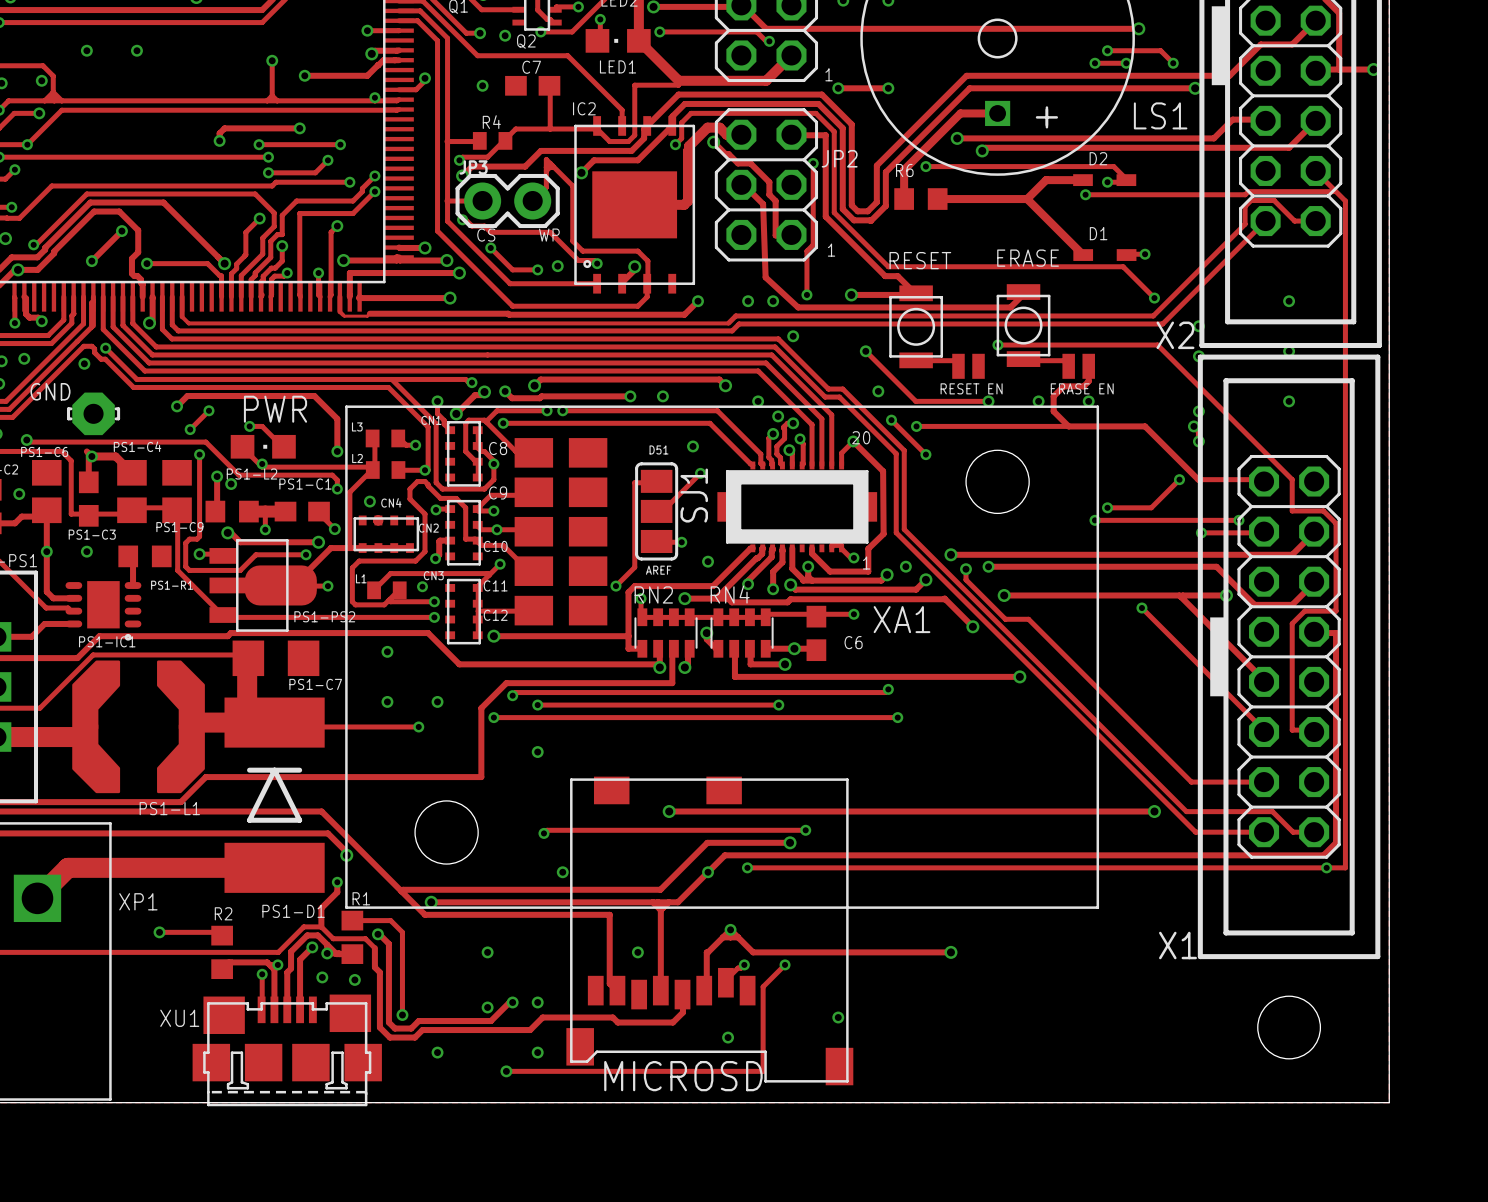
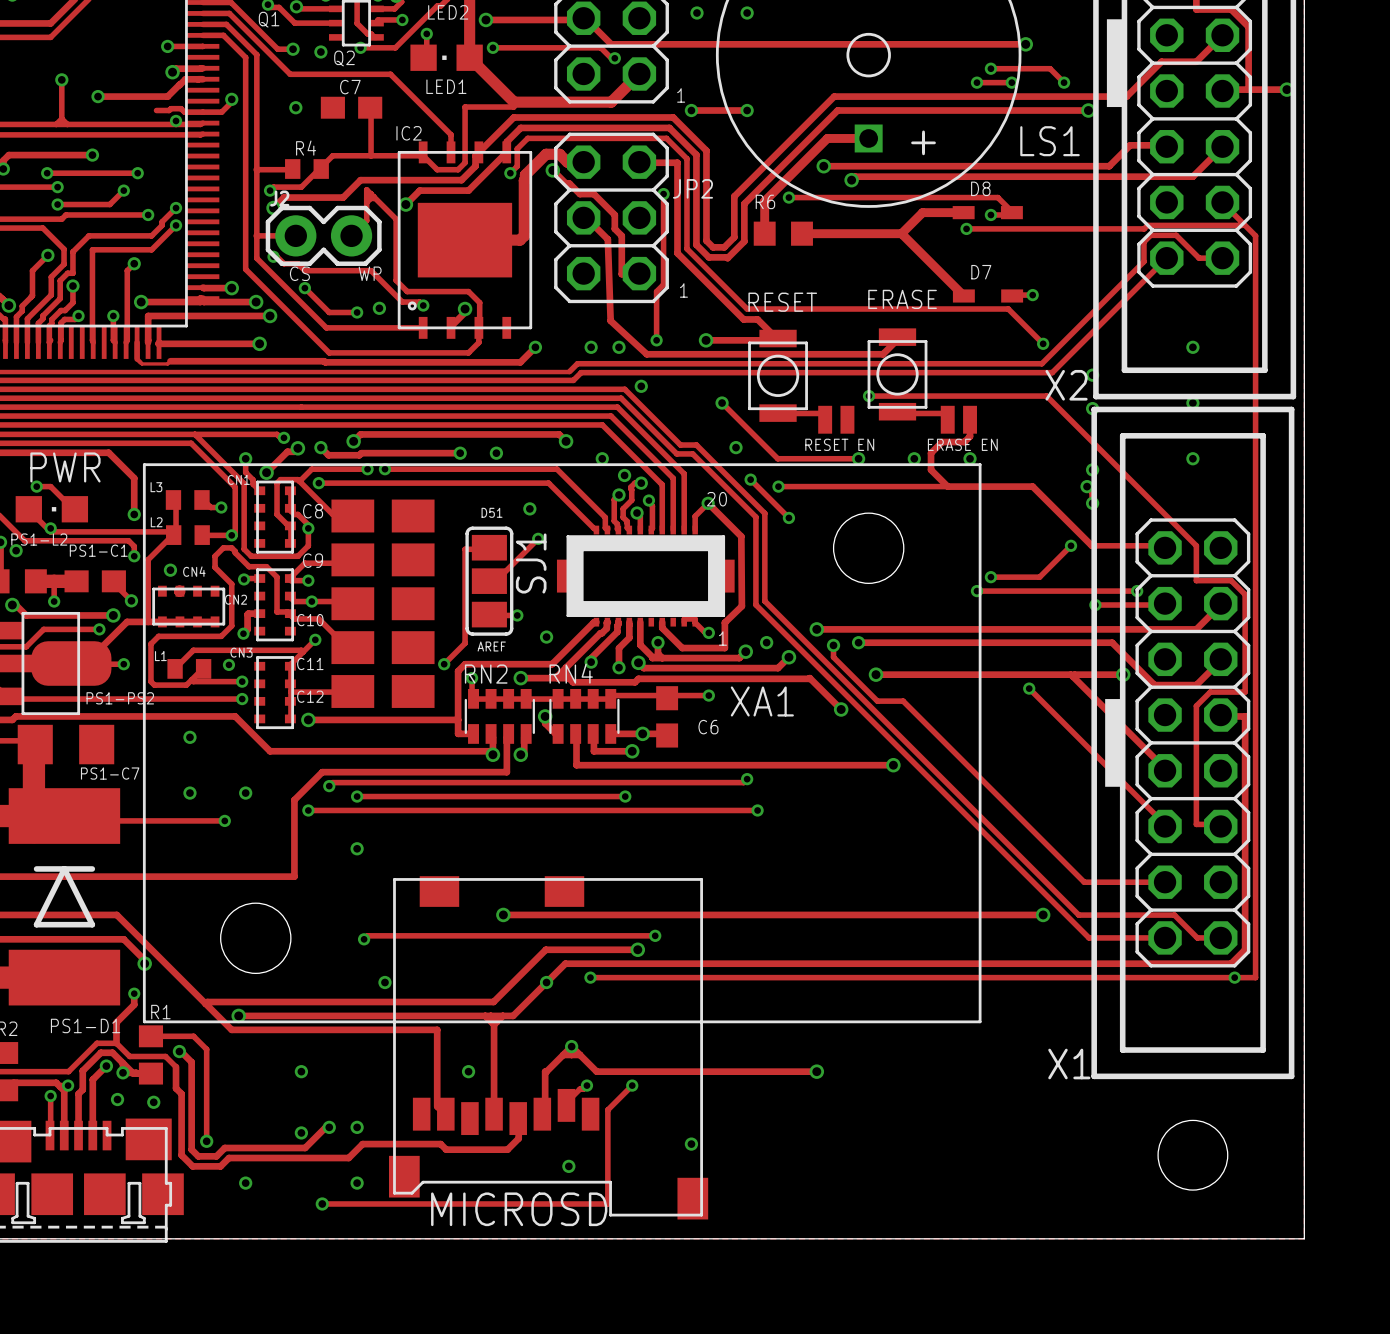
track: none -> (156, 110) (181, 108) (184, 112) (202, 112)
D2 name: D2 (1098, 158) -> D8 (980, 188)
JP3 name: JP3 (473, 167) -> J2 (279, 198)
D1 name: D1 (1098, 233) -> D7 (981, 272)

